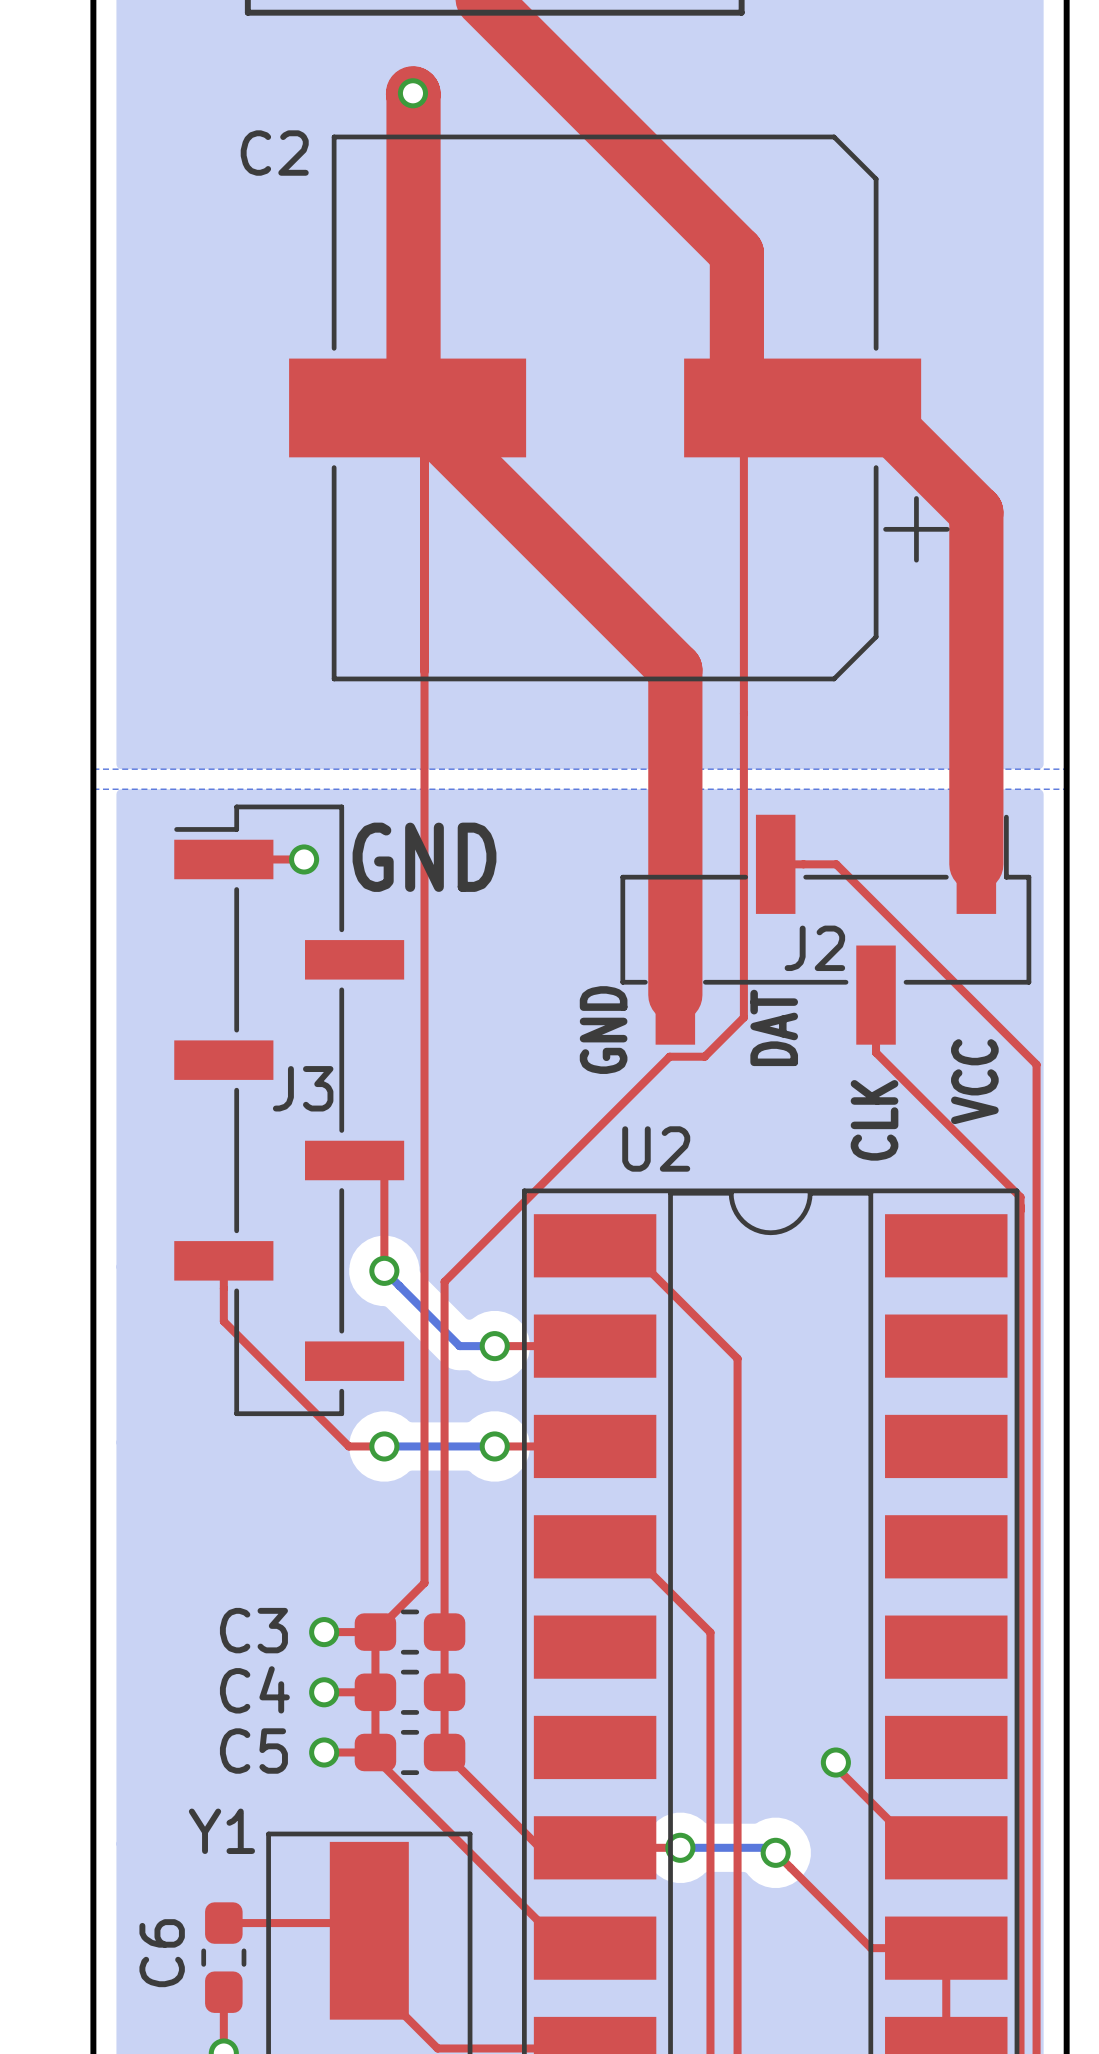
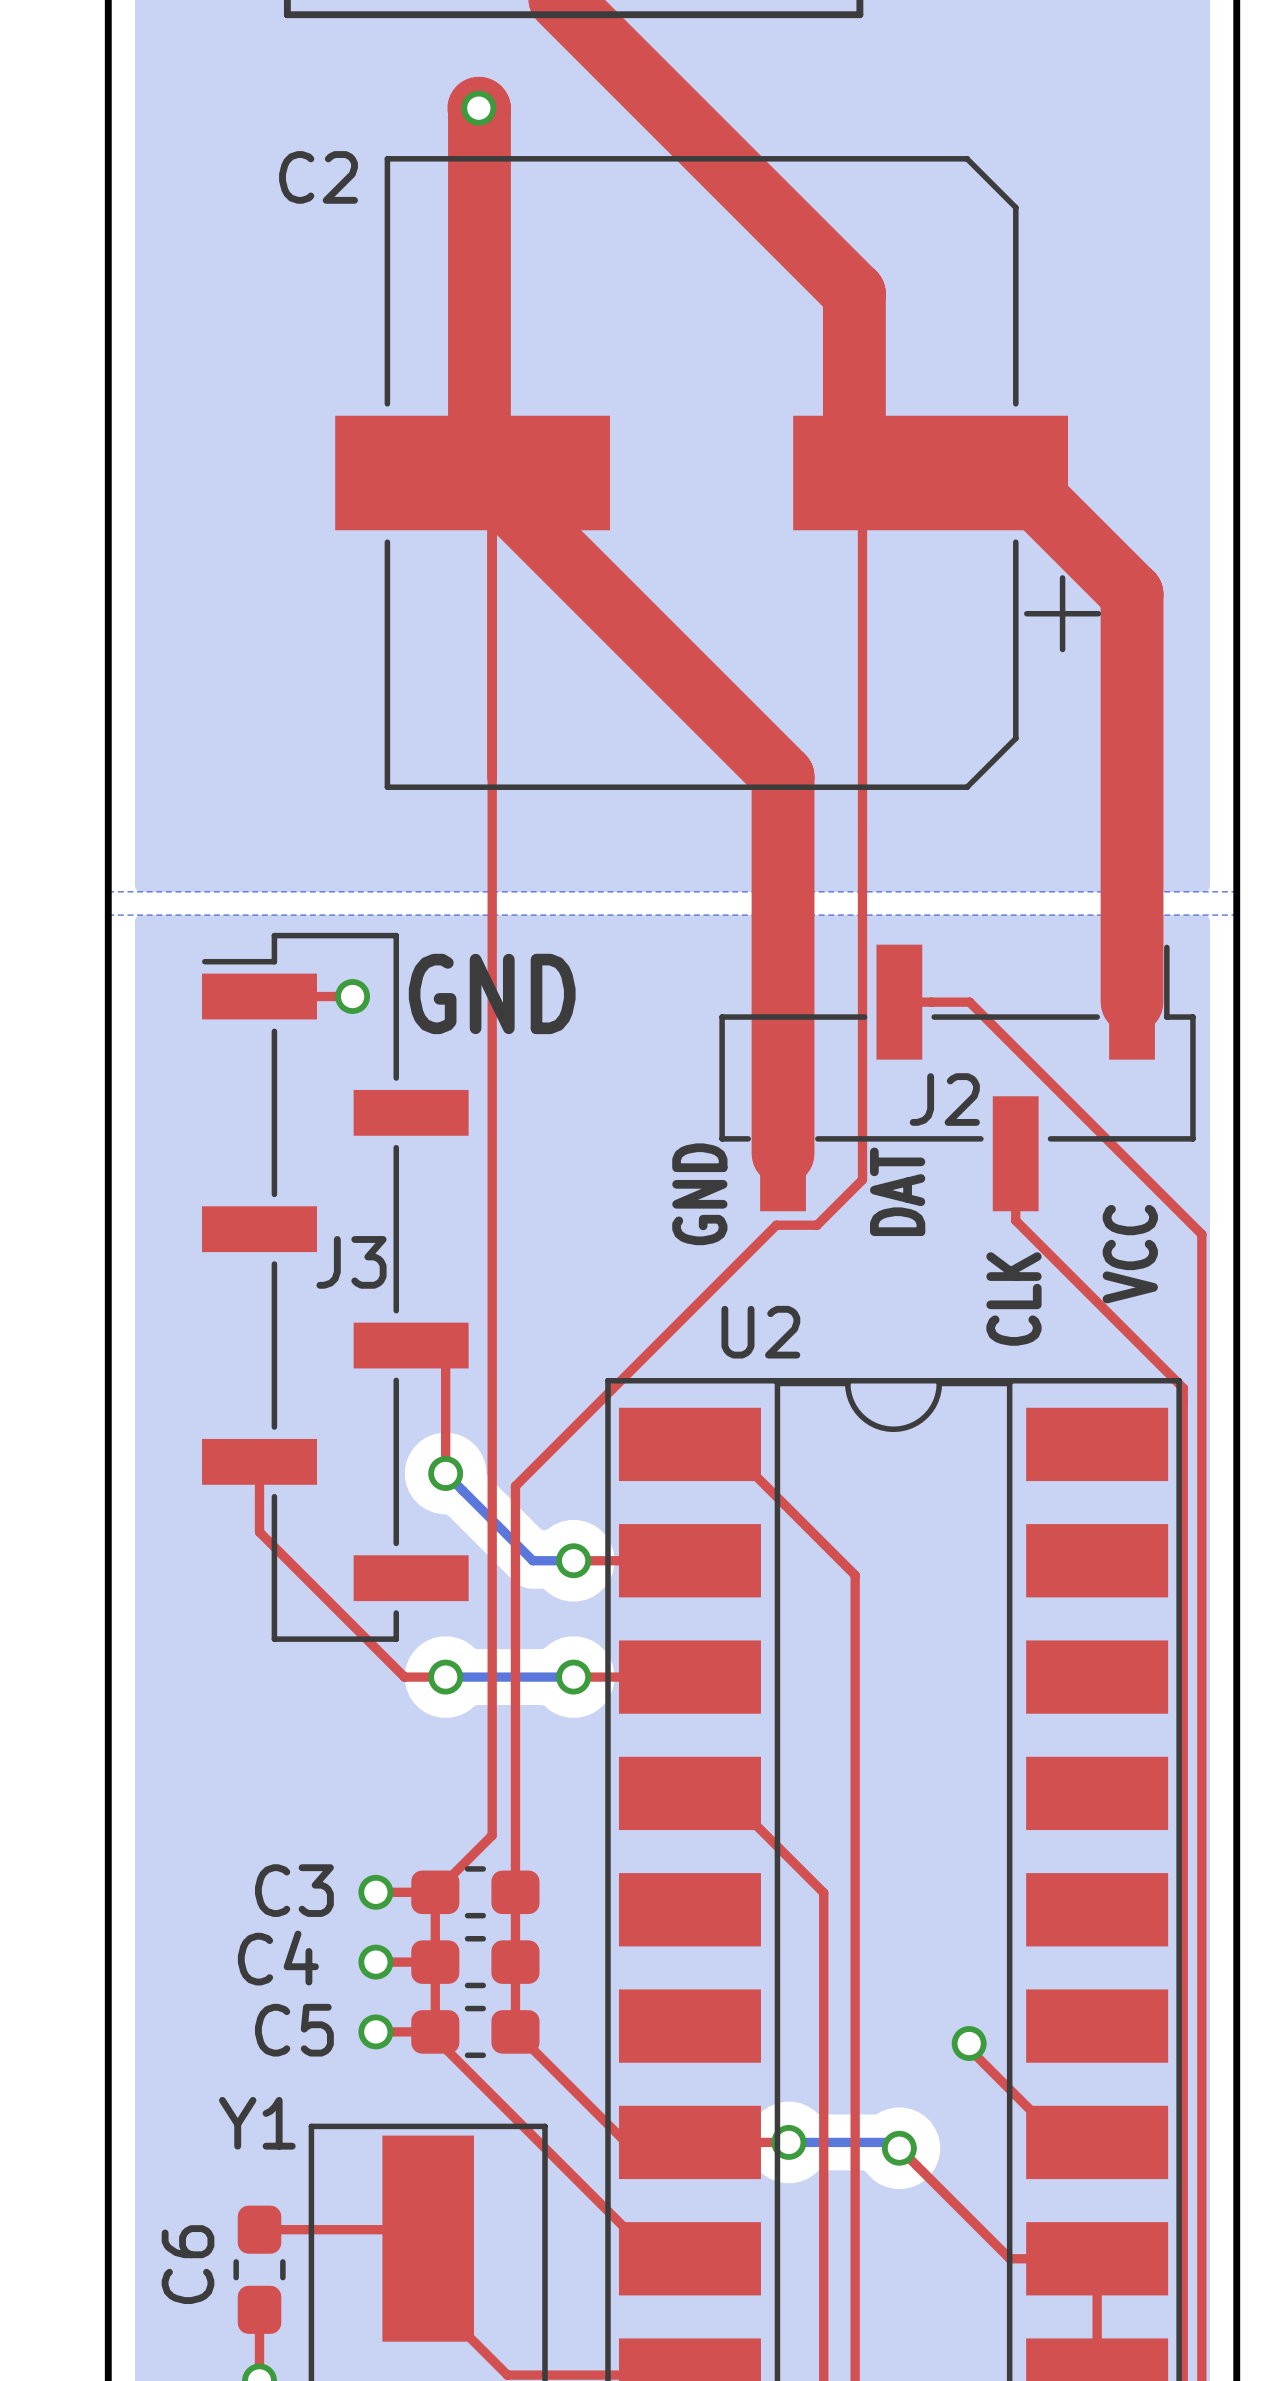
C4 name position: C4 (254, 1689) -> C4 (278, 1958)

